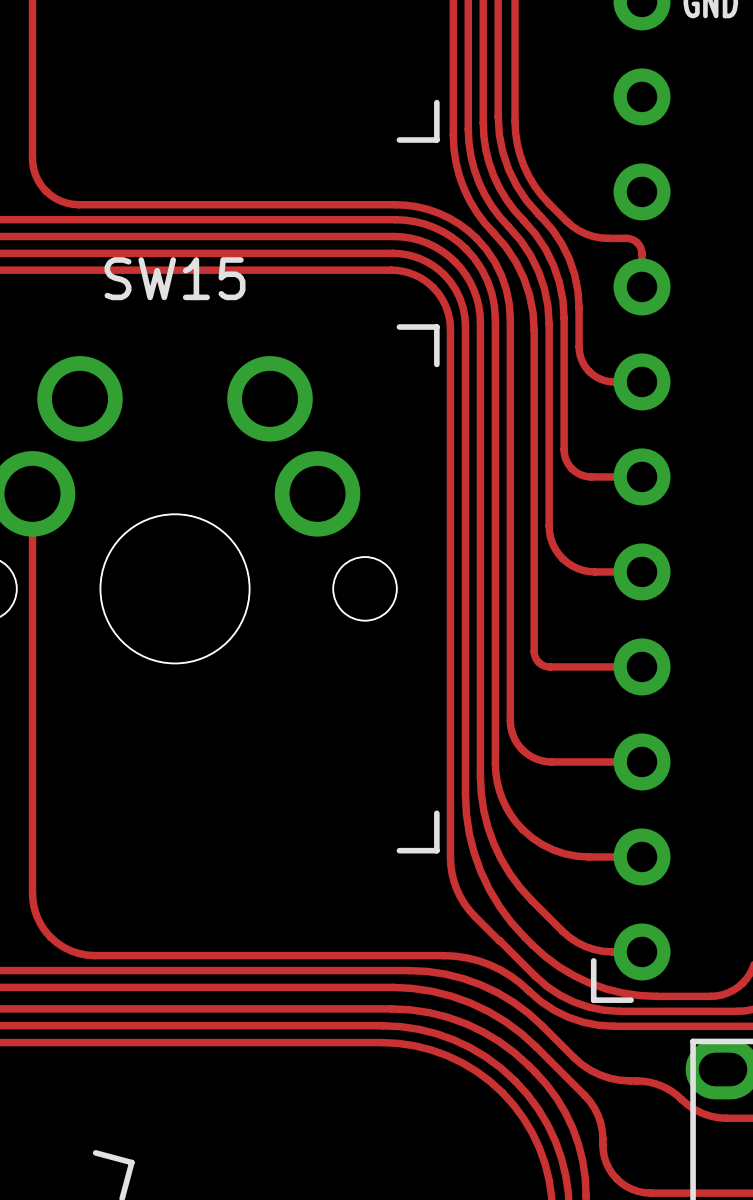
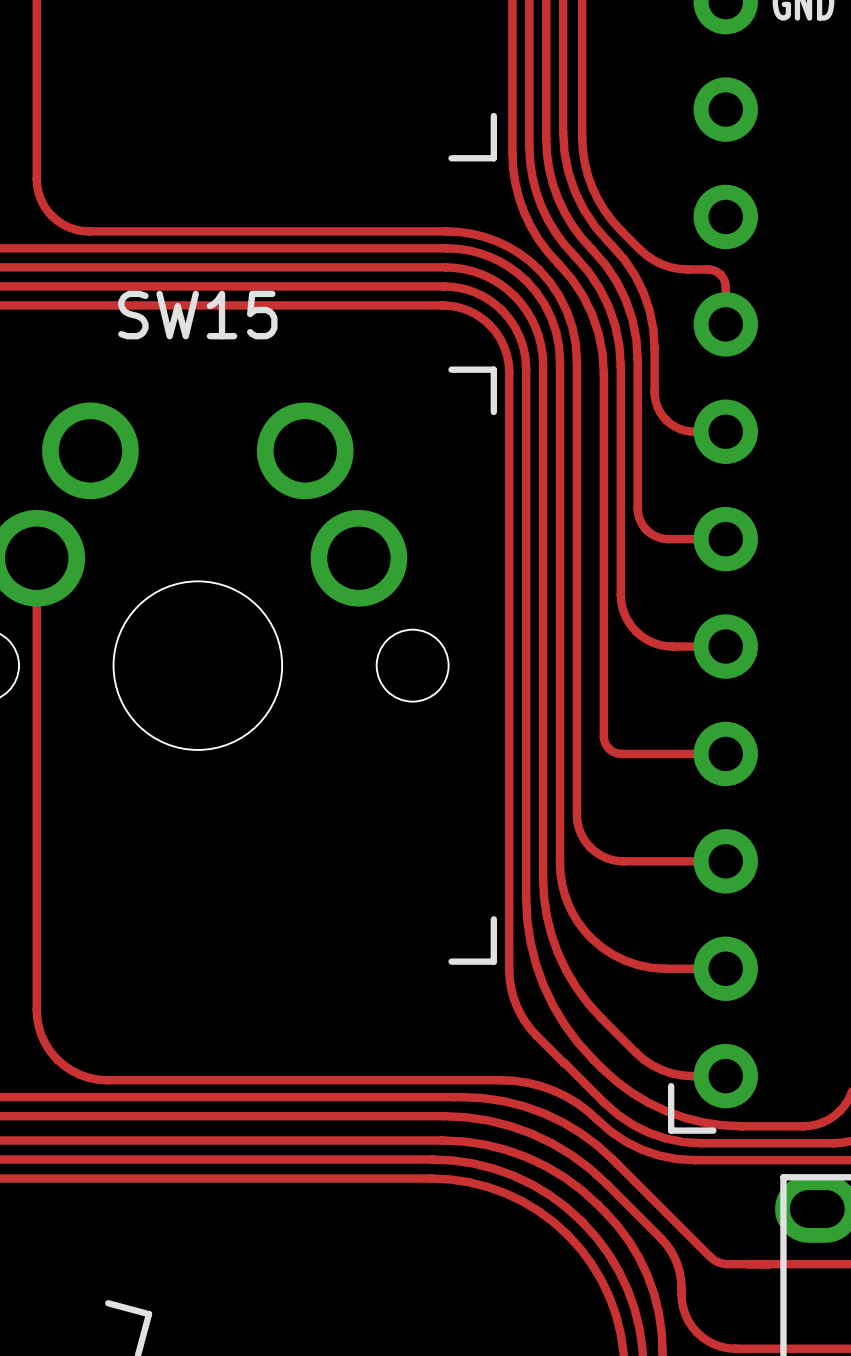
track: (574, 1057) (599, 1074) (619, 1080) (655, 1083) (672, 1091) (688, 1105) (702, 1113) (726, 1118) -> (648, 1195) (710, 1256) (718, 1262) (727, 1264) (821, 1264)

